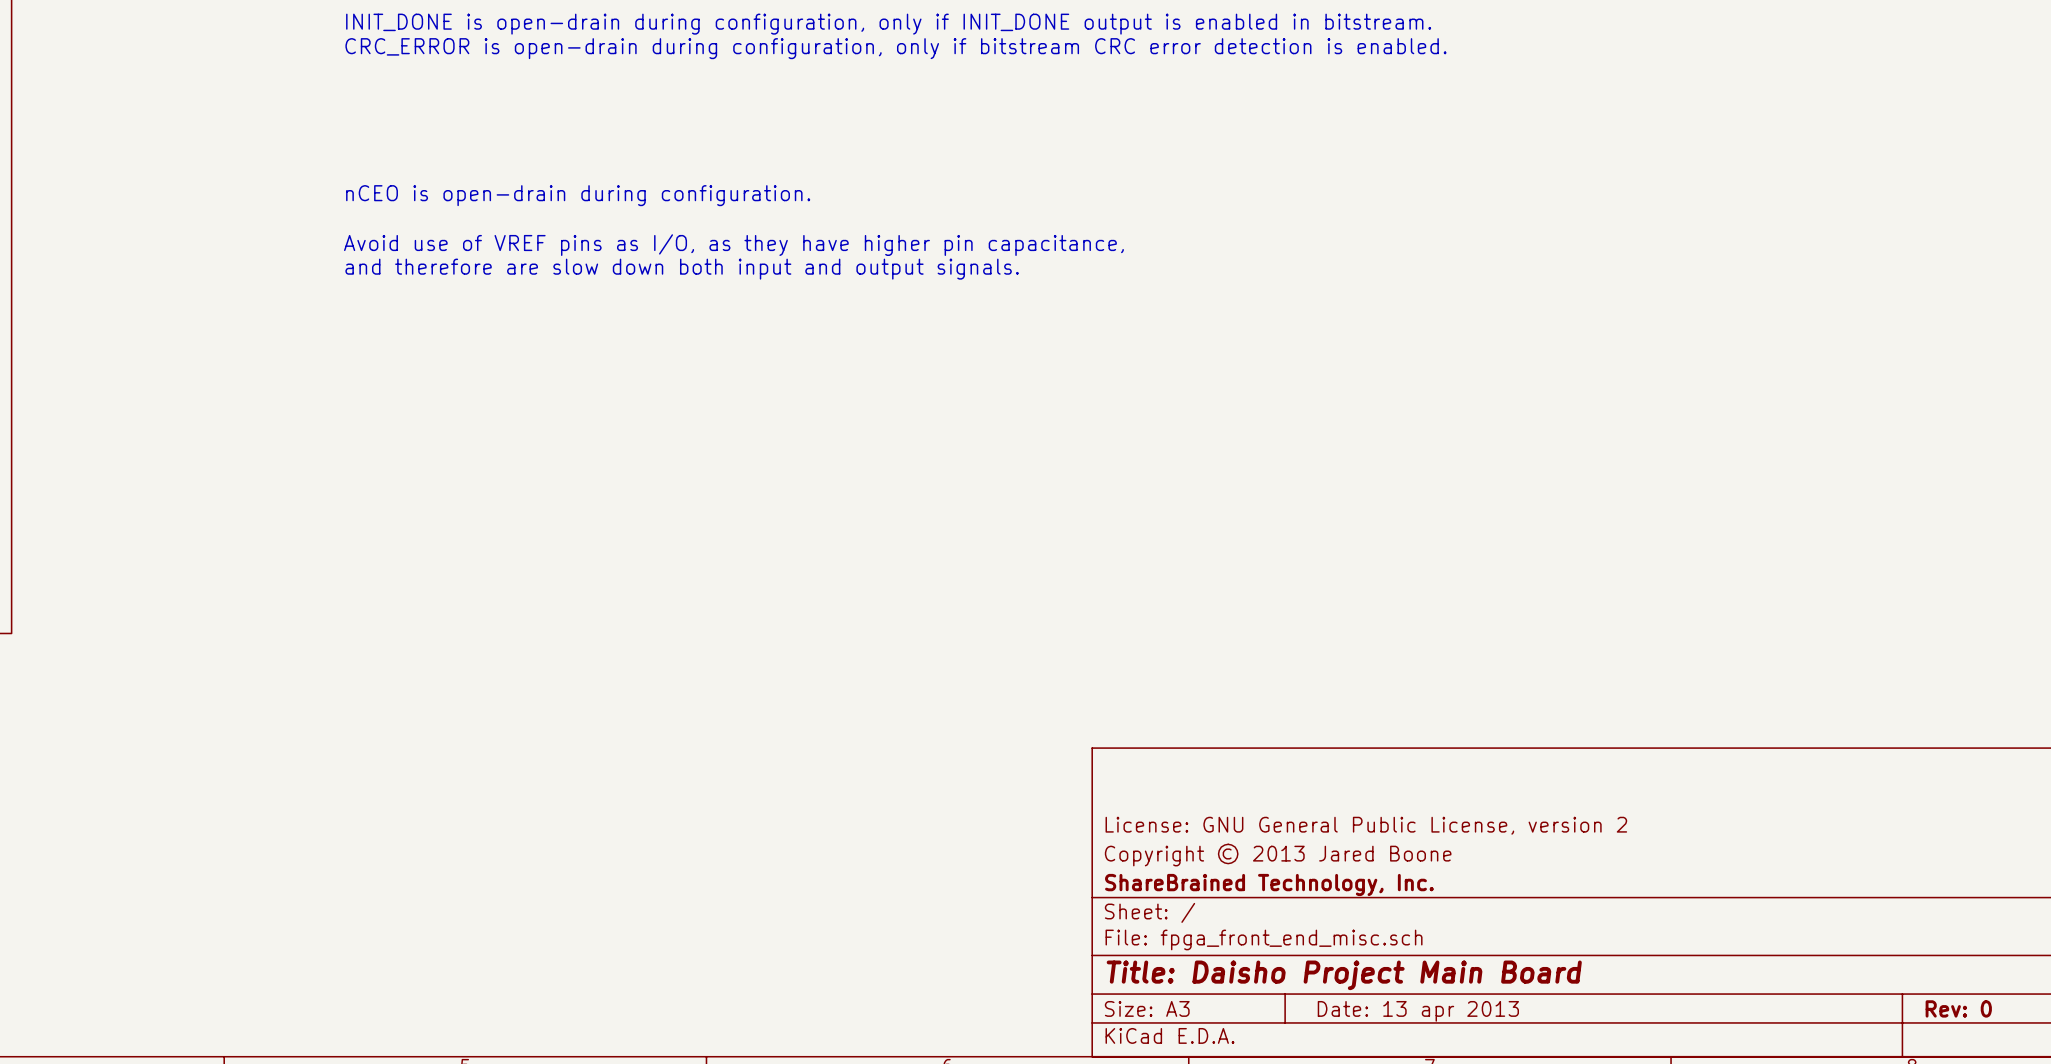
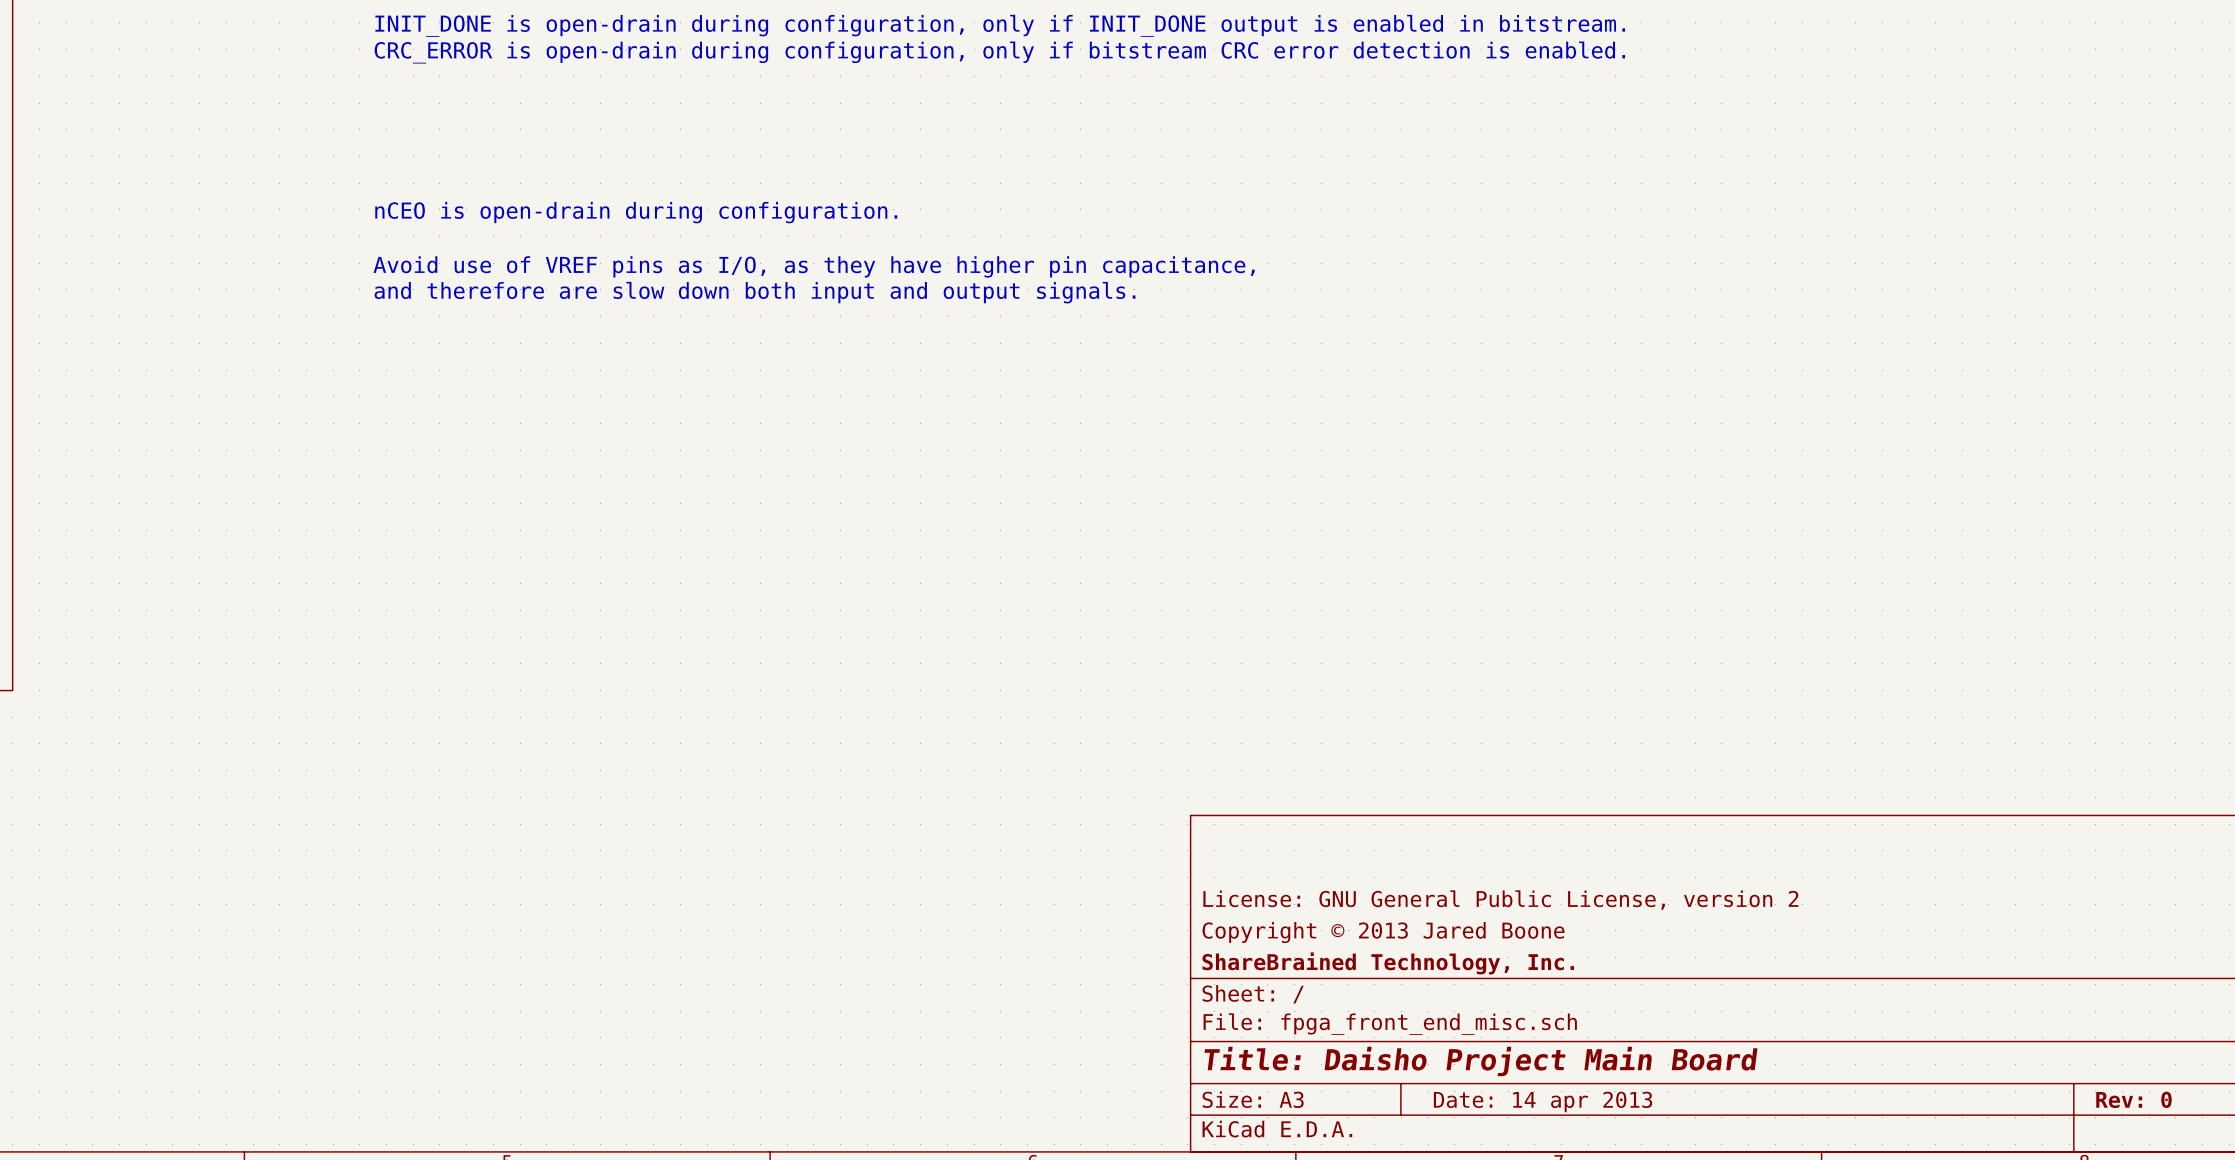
title block: Date: 13 apr 2013 (1418, 1011) -> Date: 14 apr 2013 (1543, 1101)

